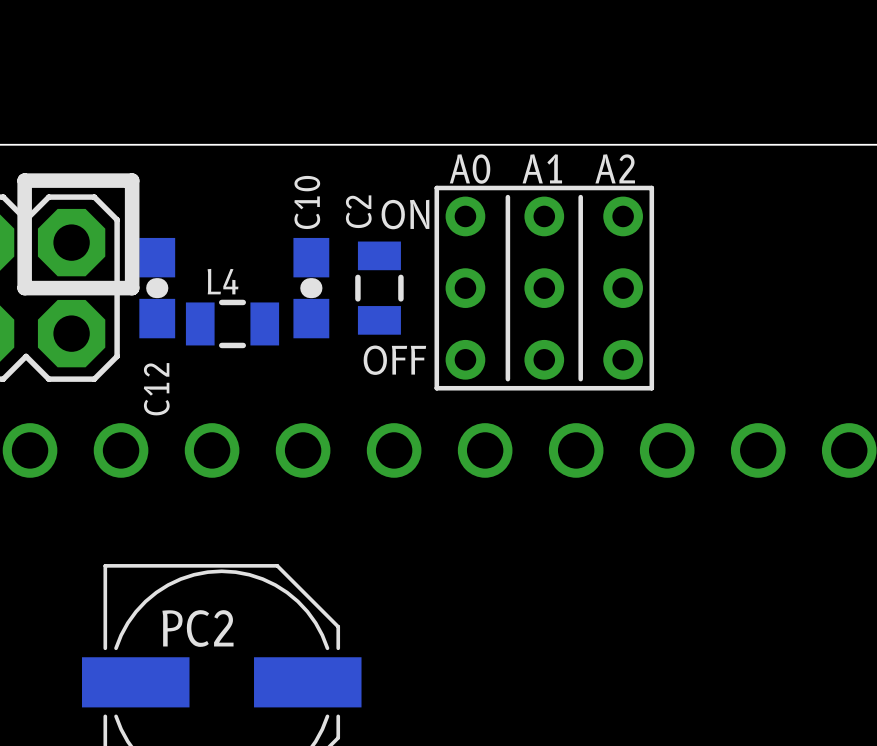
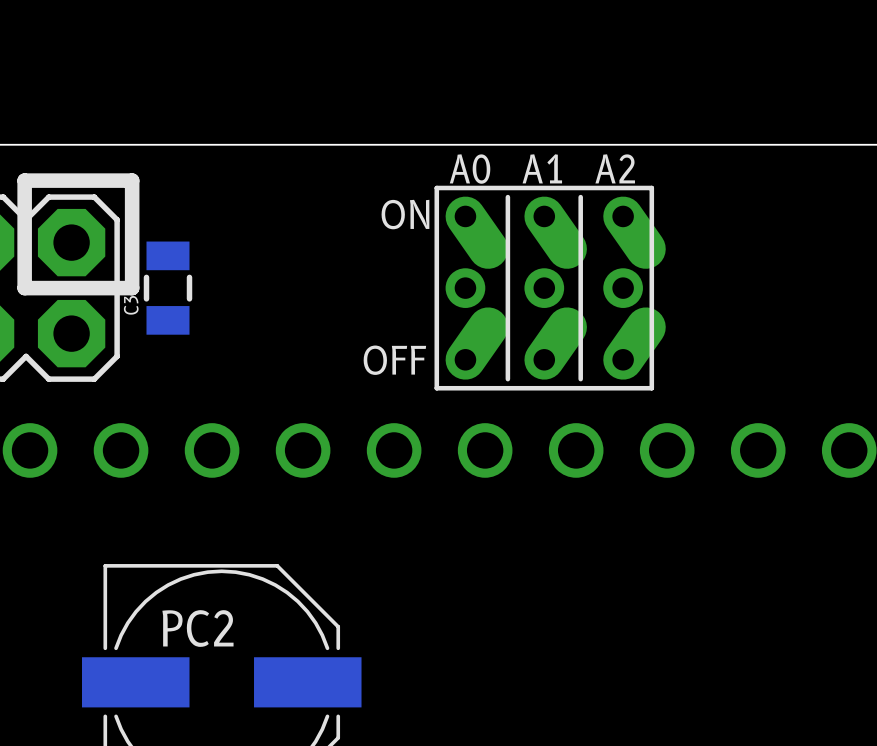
part footprint: [434, 185, 655, 391] -> [434, 185, 666, 391]
C12: (157, 288) -> none
C3: none -> (168, 288)
C10: (311, 288) -> none
C2: (379, 288) -> none
L4: (232, 323) -> none

